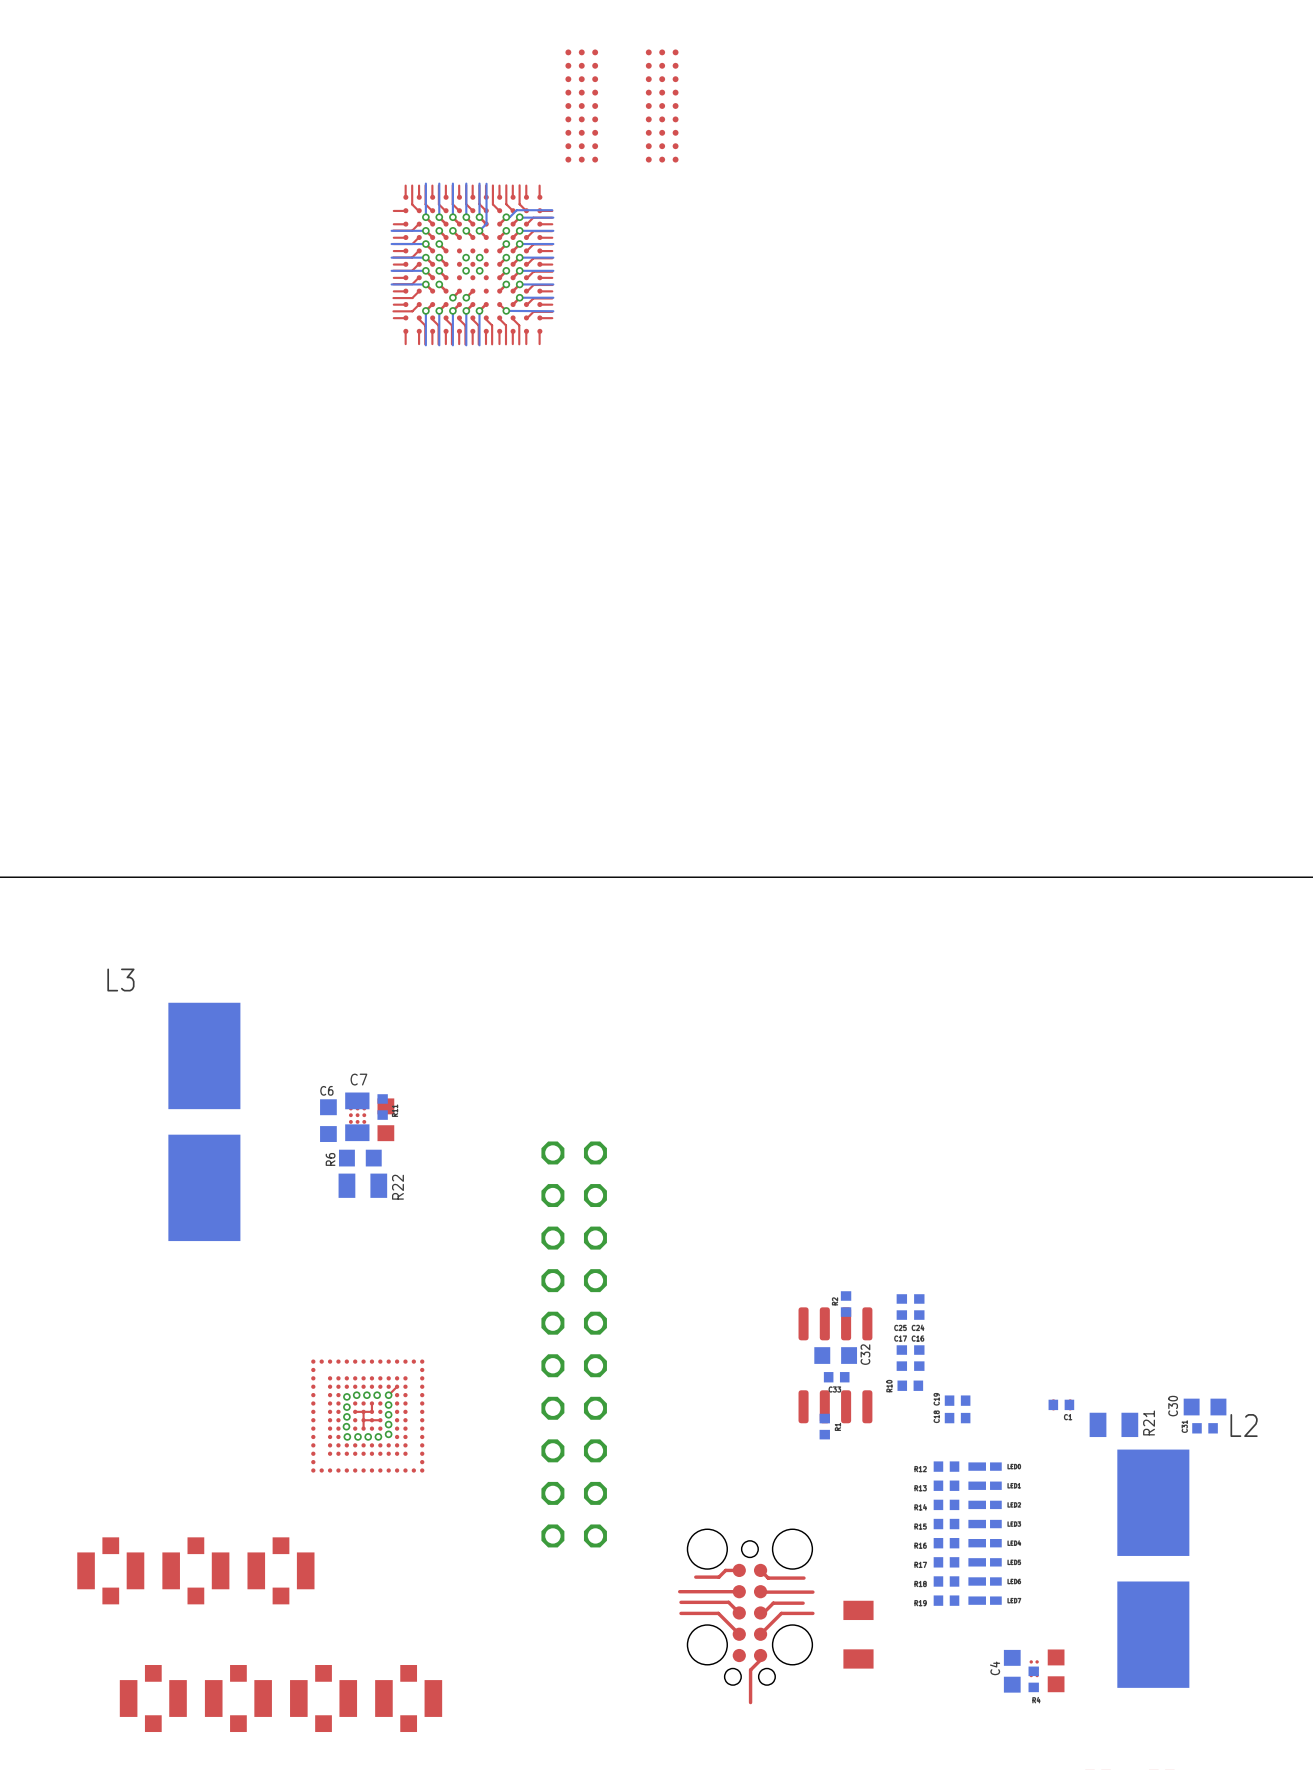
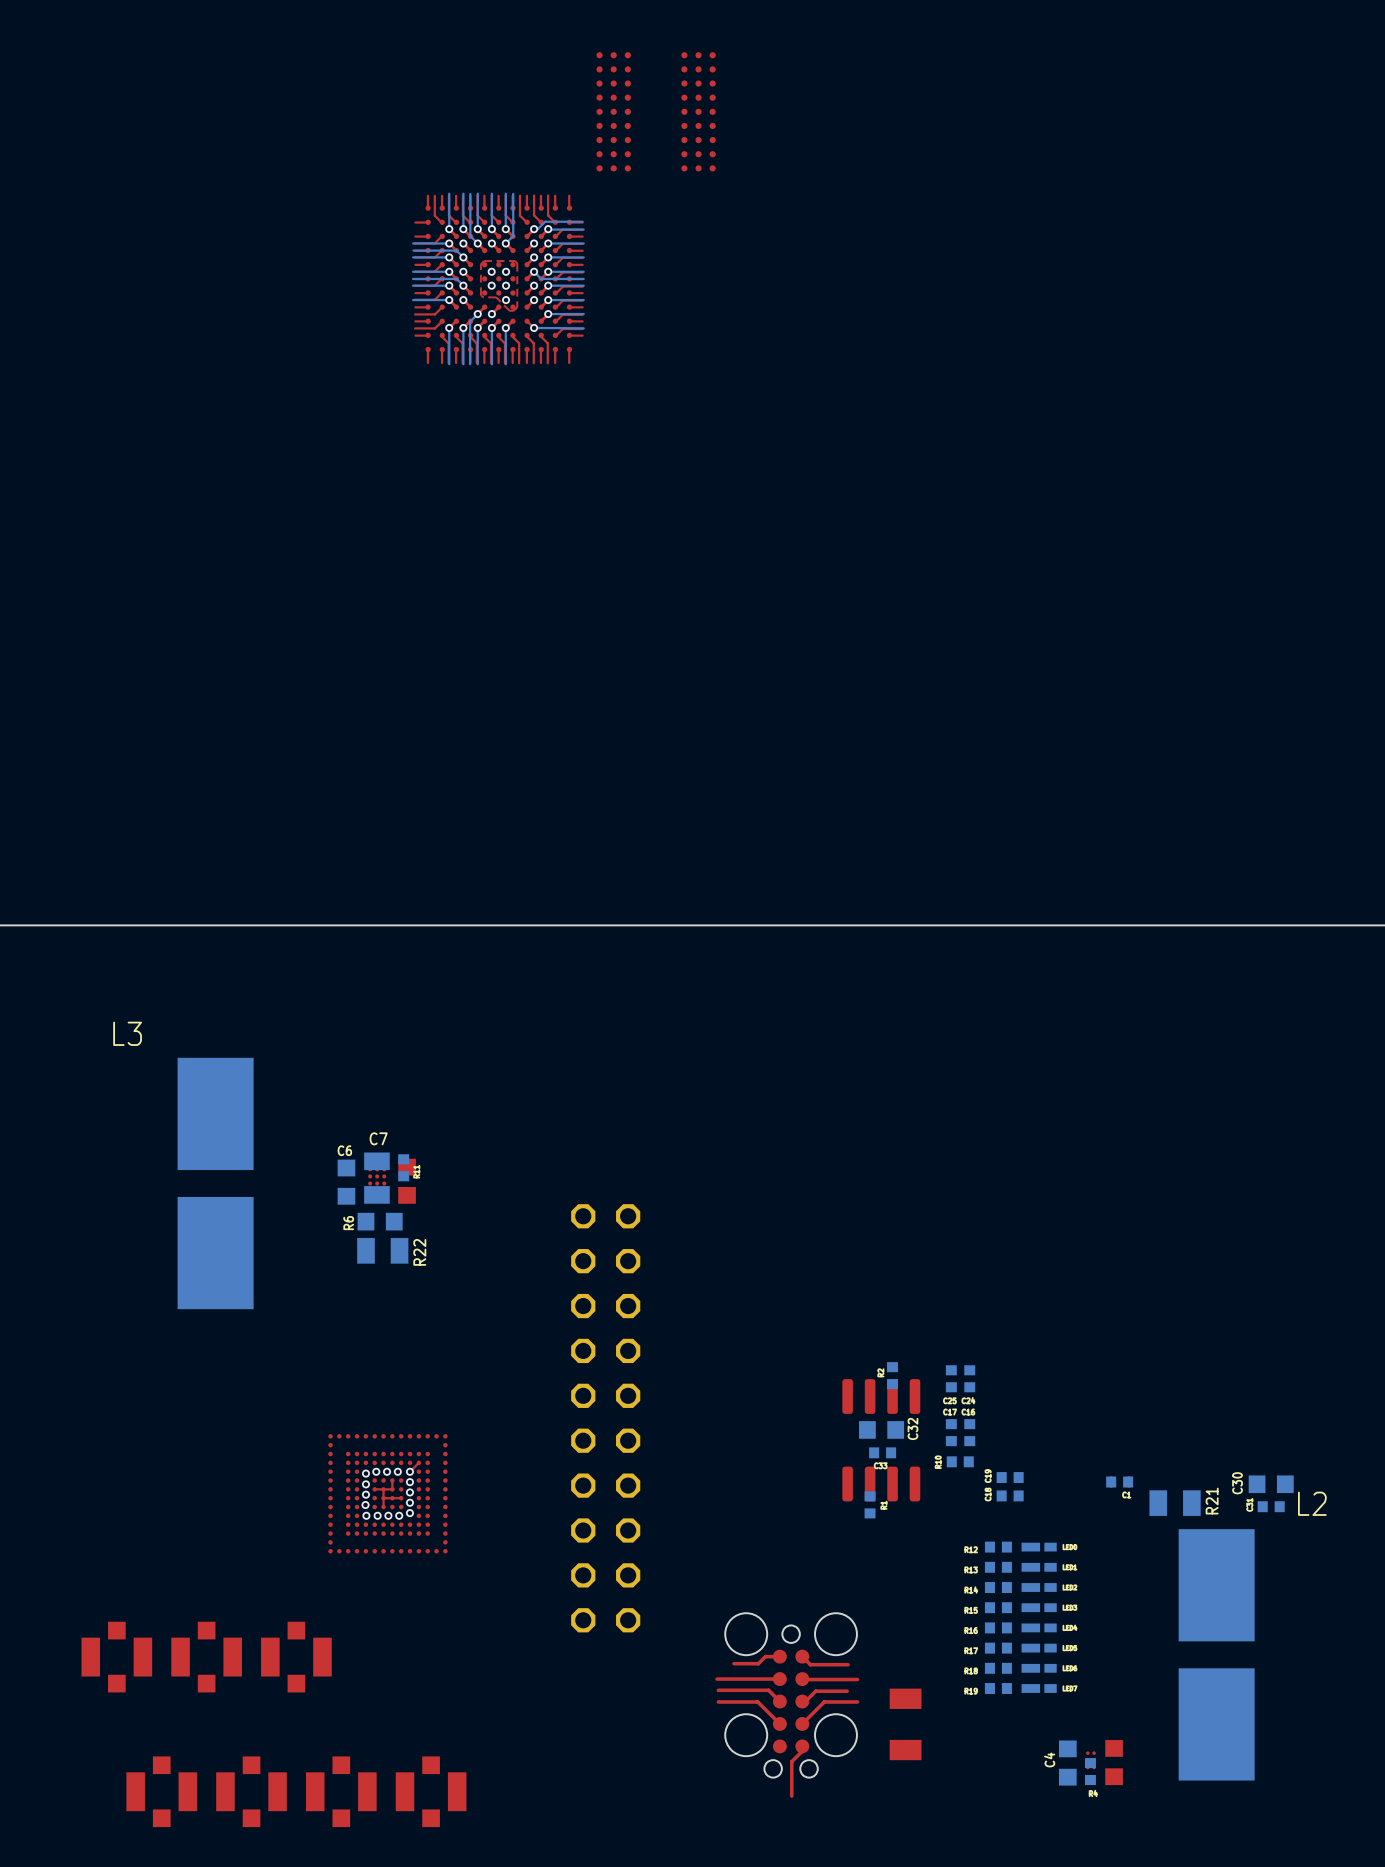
bottom track: none -> (470, 193) (470, 236) (477, 243)
bottom track: none -> (413, 250) (456, 250) (463, 257)
top zone outline: none -> (515, 261) (484, 261) (480, 264) (480, 295) (483, 297) (496, 297) (509, 310) (513, 310) (517, 307) (517, 263) (515, 261)
bottom track: none -> (534, 271) (541, 278) (583, 278)
bottom track: none -> (413, 278) (456, 278) (463, 285)
via: none -> (506, 300)
bottom track: none -> (477, 314) (470, 321) (470, 364)

